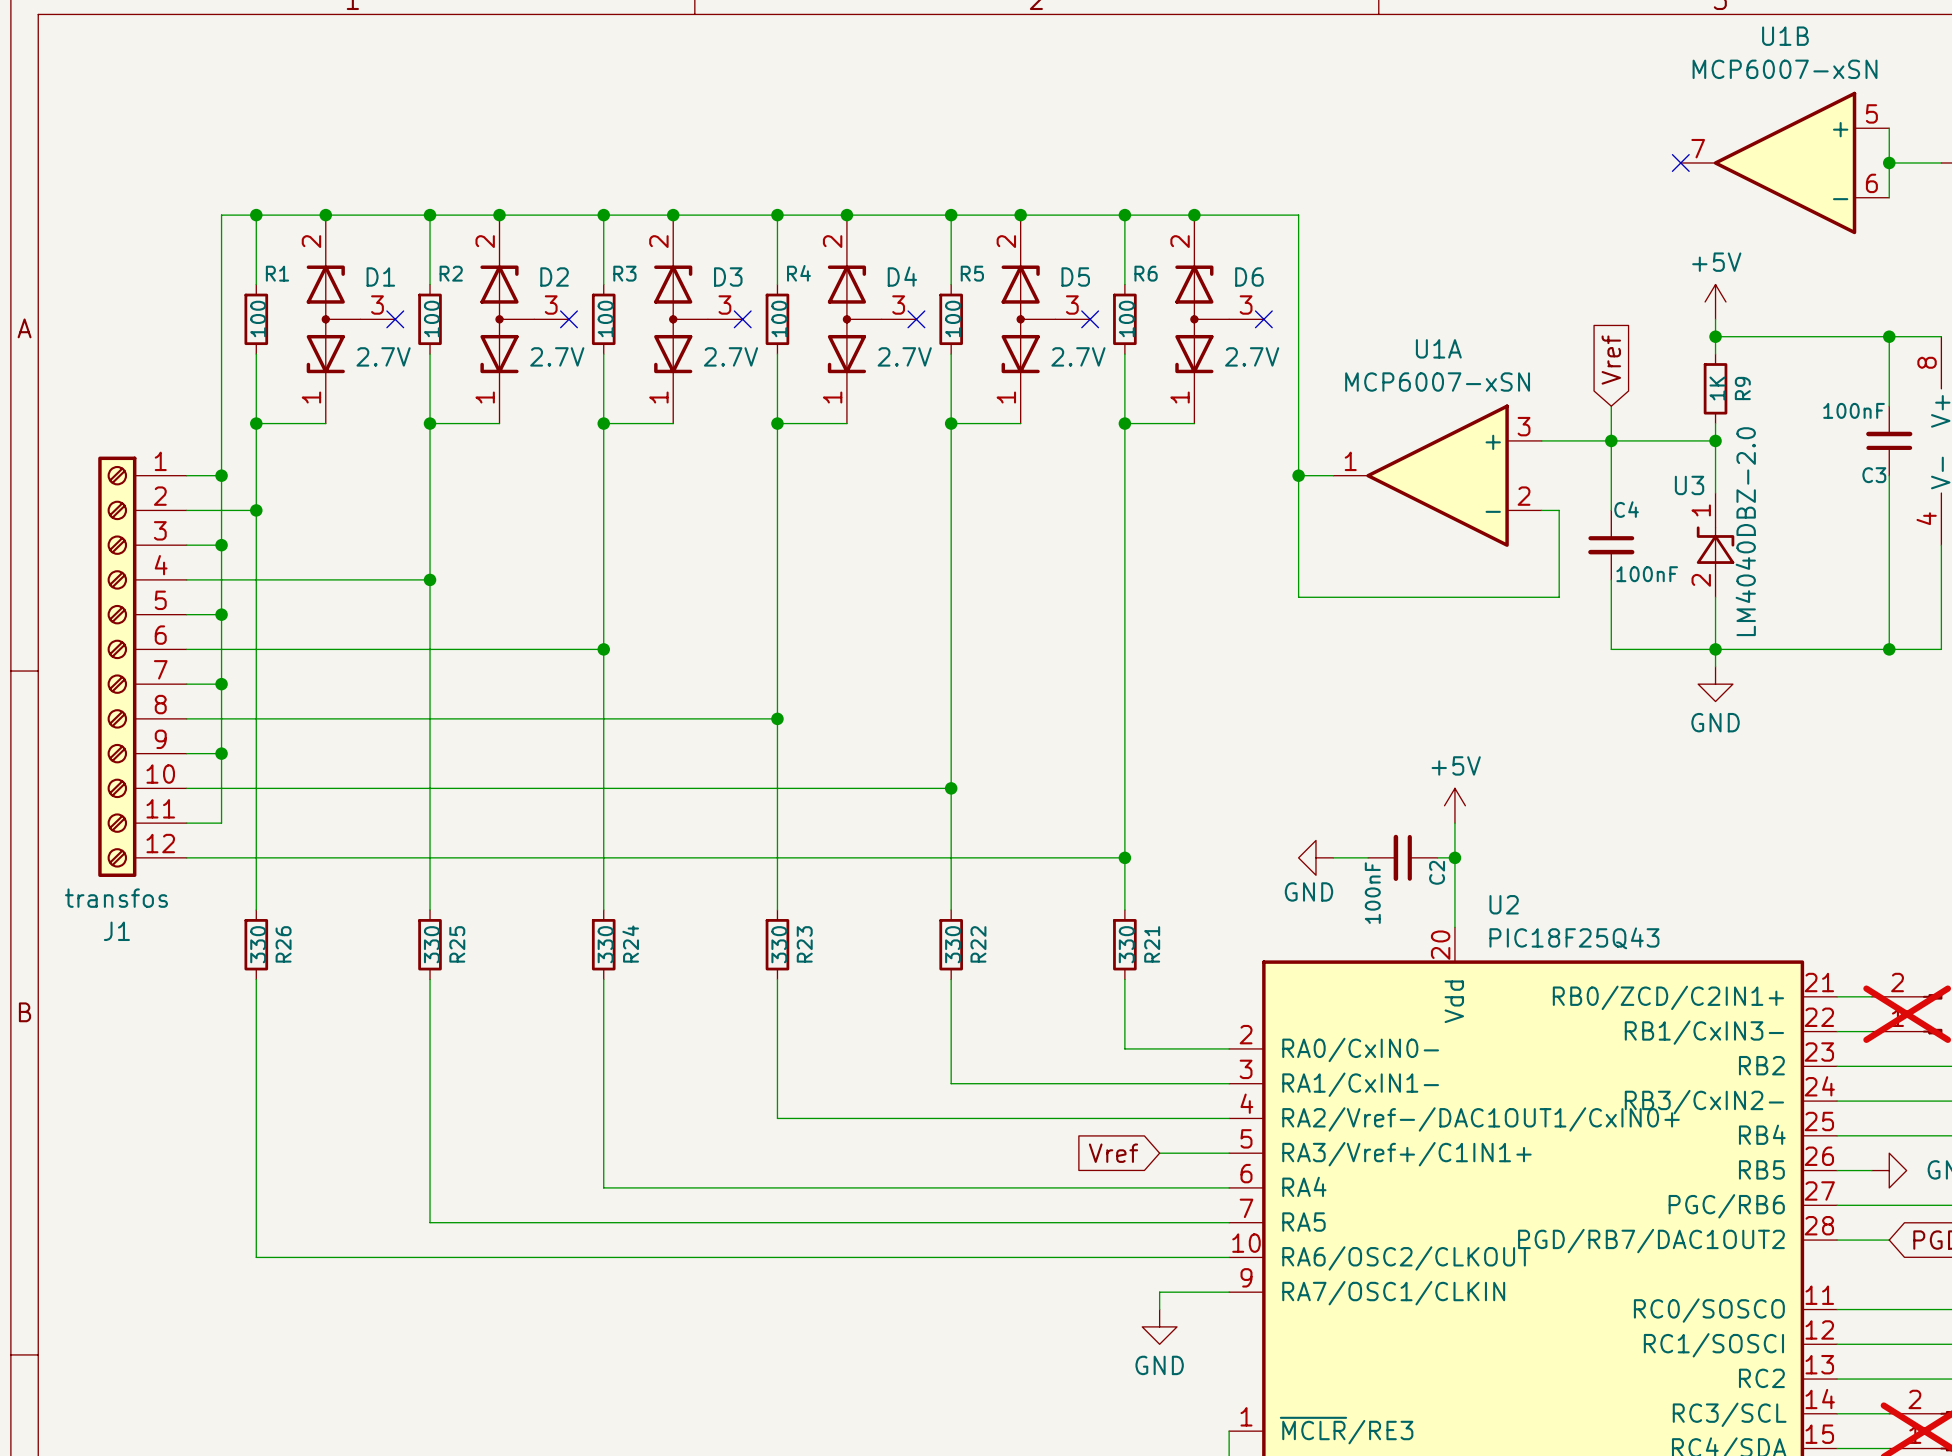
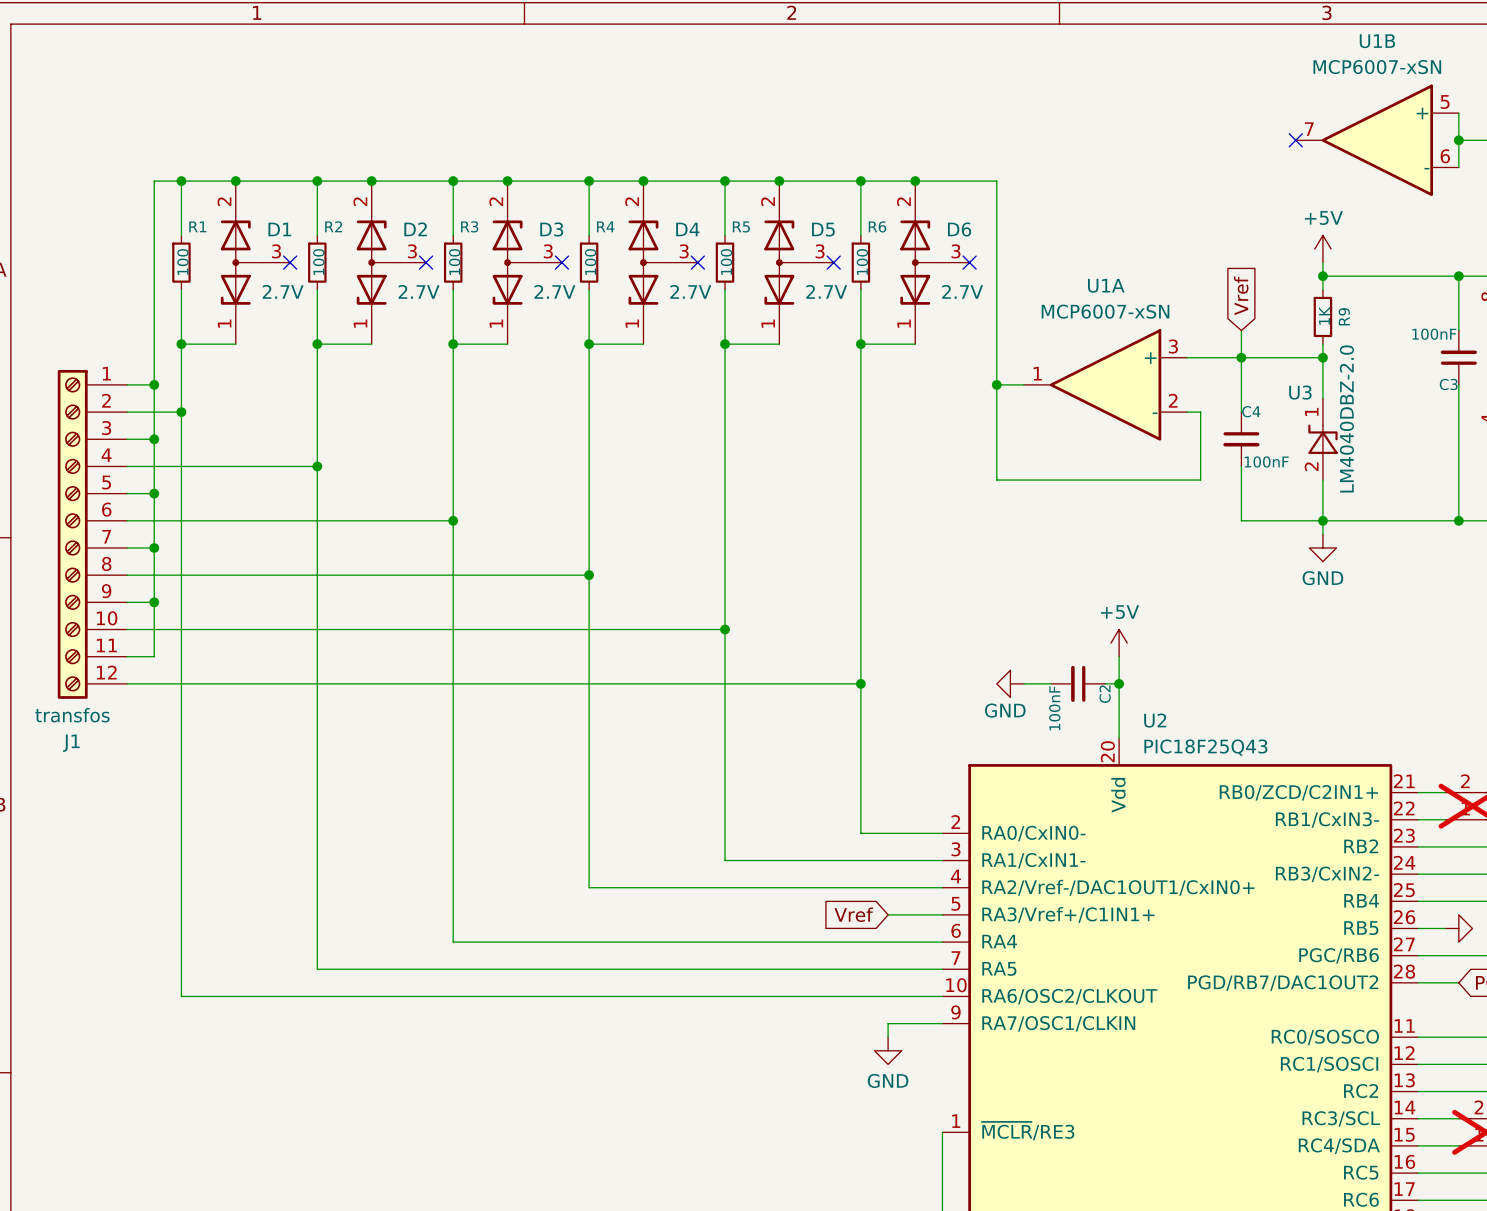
wire: none -> (181, 724) (181, 779)
wire: none -> (317, 724) (317, 779)
wire: none -> (453, 724) (453, 779)
wire: none -> (589, 724) (589, 779)
wire: none -> (725, 724) (725, 779)
wire: none -> (860, 724) (860, 779)
R26: 330 (256, 944) -> none
R25: 330 (430, 944) -> none
R24: 330 (603, 944) -> none
R23: 330 (777, 944) -> none
R22: 330 (951, 944) -> none
R21: 330 (1124, 944) -> none

